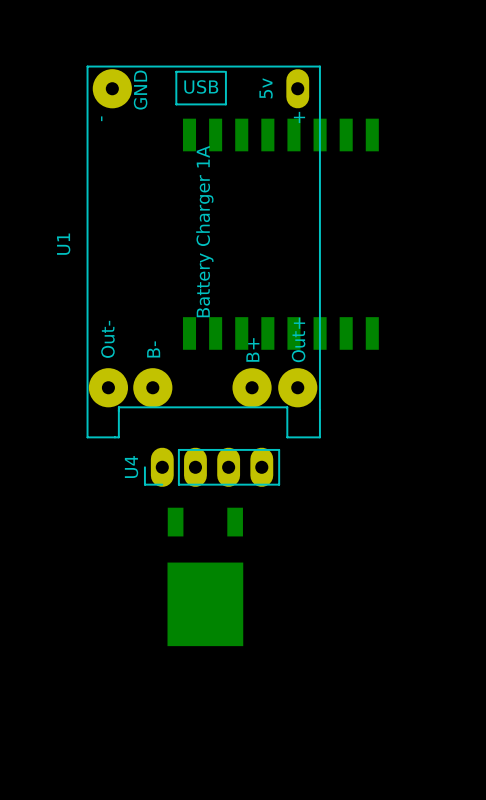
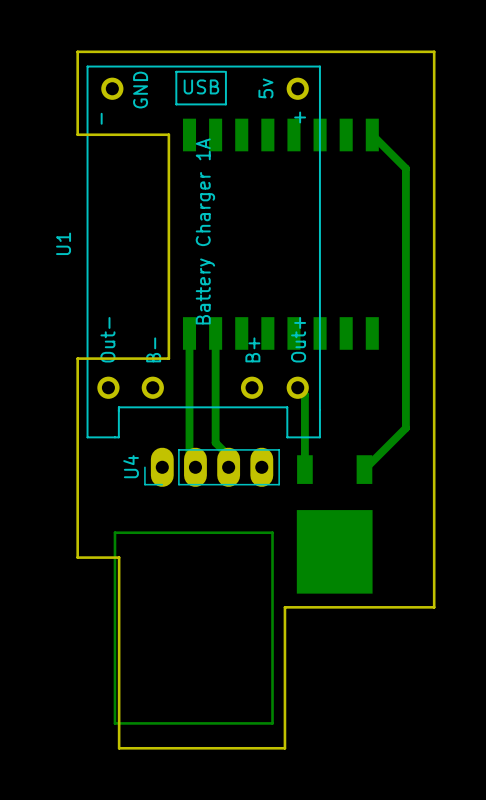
board edge: none -> (77, 51) (77, 134) (168, 134) (168, 358) (77, 358) (77, 557) (119, 557) (119, 748) (284, 748) (284, 607) (434, 607) (434, 51) (77, 51)
U1 footprint: [86, 65, 321, 439] -> [86, 65, 321, 439]
bottom track: none -> (372, 134) (405, 168) (405, 428) (364, 469)
bottom track: none -> (189, 333) (189, 461) (195, 467)
bottom track: none -> (215, 333) (215, 442) (228, 455) (228, 467)
bottom track: none -> (297, 387) (304, 394) (304, 469)
bottom track: none -> (114, 532) (272, 532) (272, 723) (114, 723) (114, 532)
part position: (205, 576) -> (334, 524)

